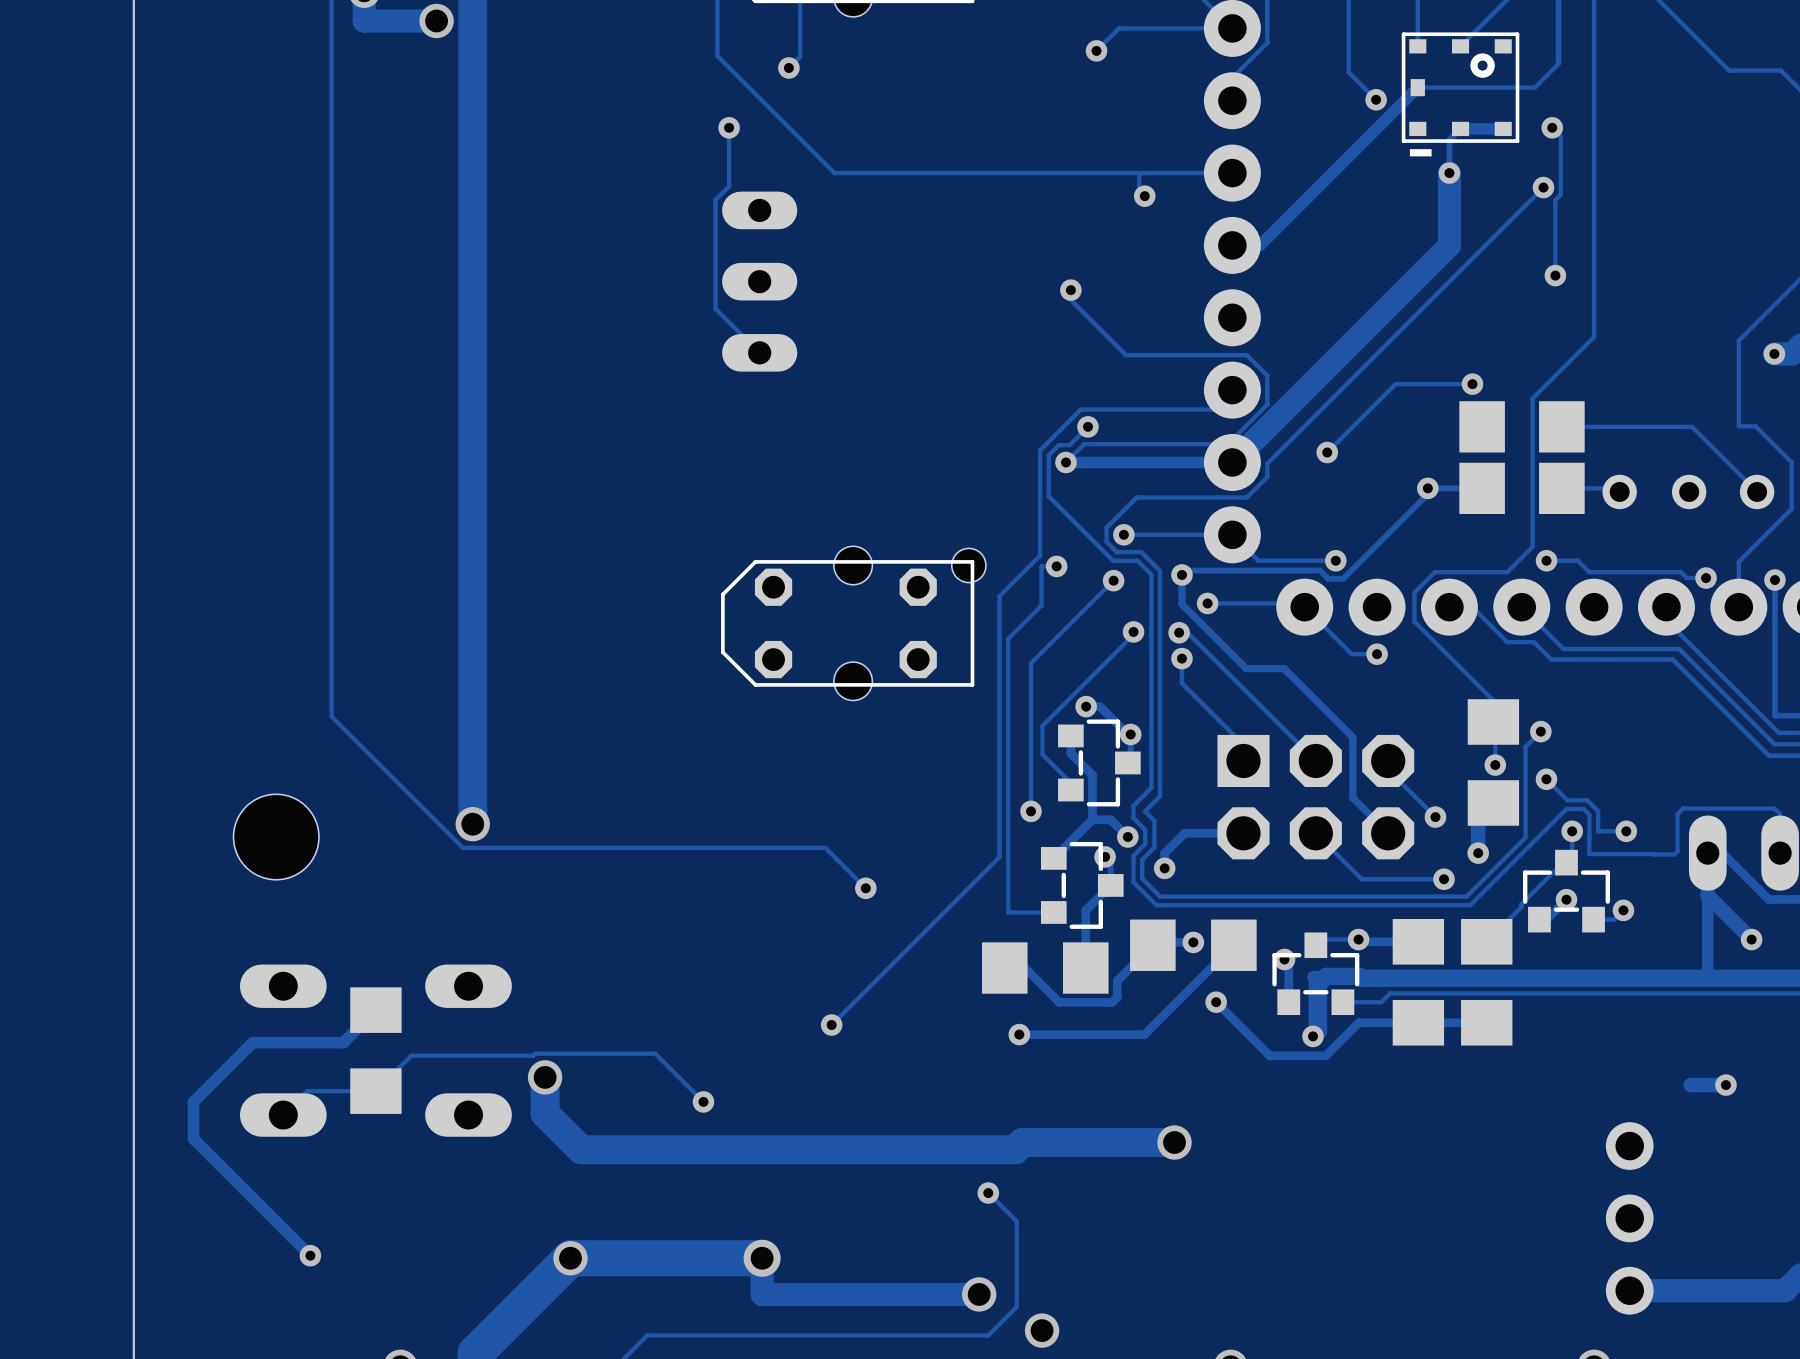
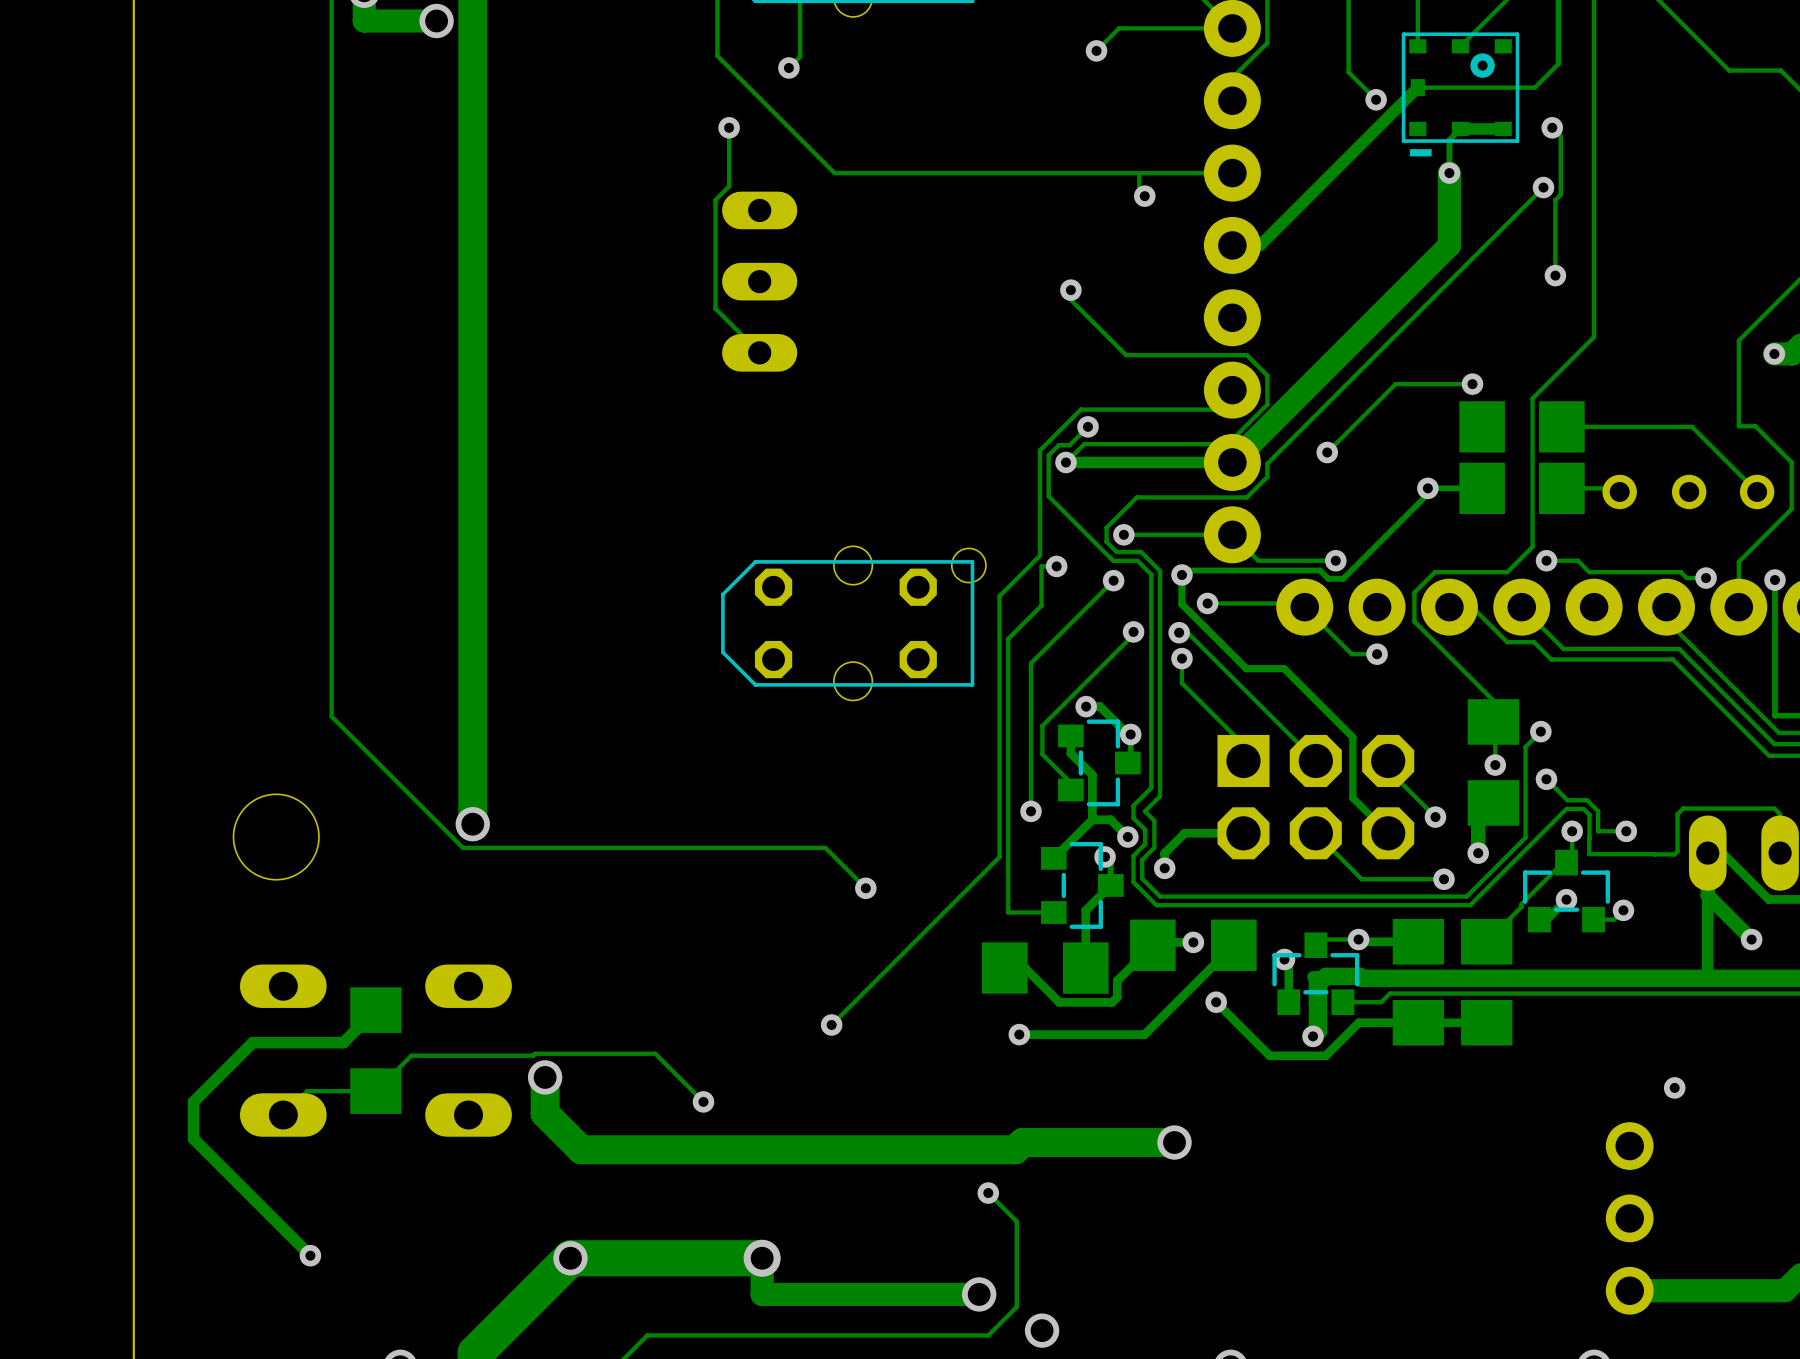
track: (1725, 1085) (1690, 1085) -> none
via position: (1725, 1085) -> (1674, 1087)

